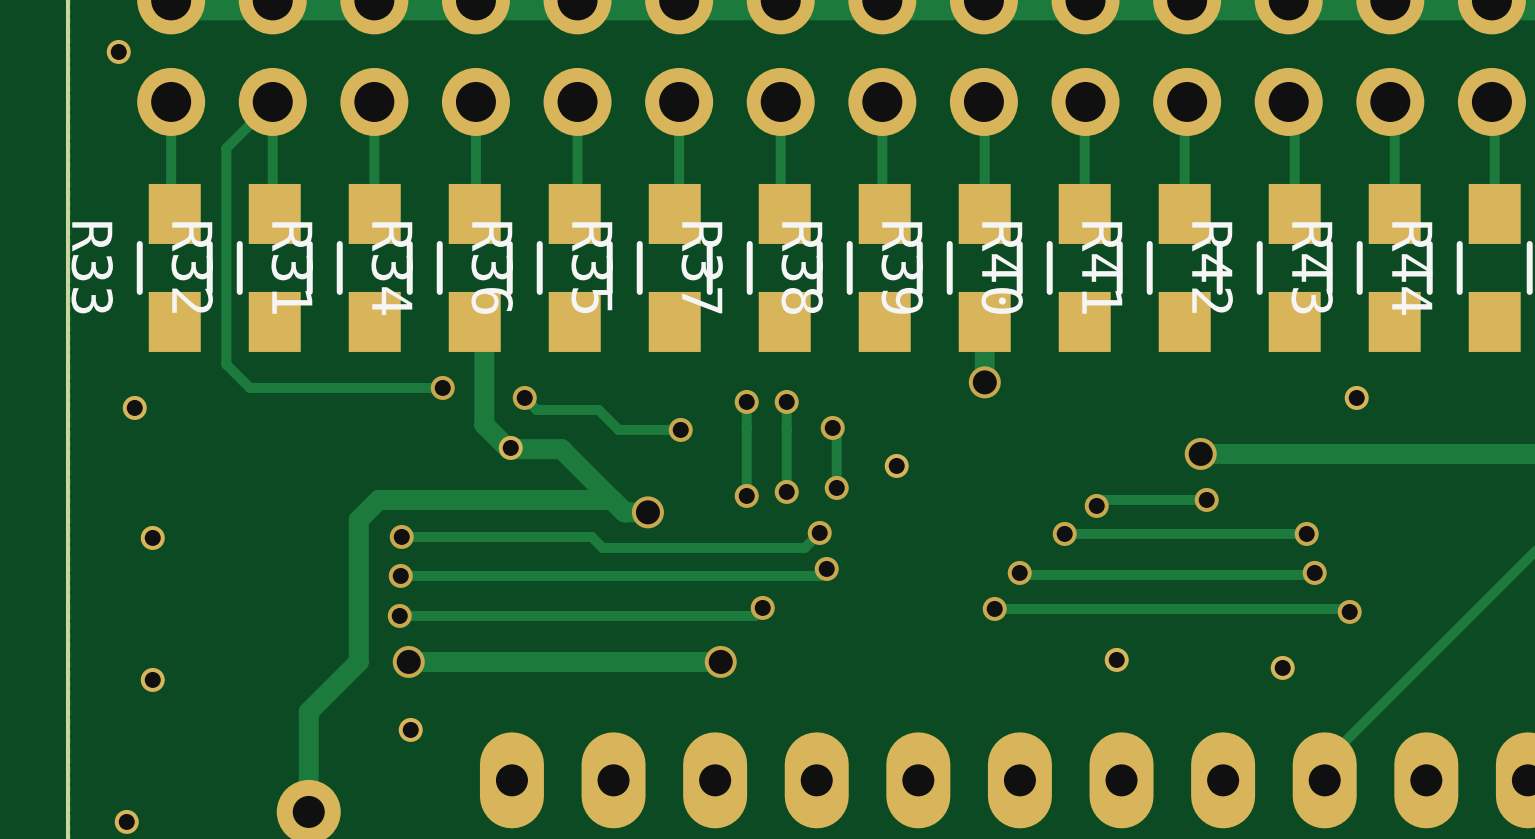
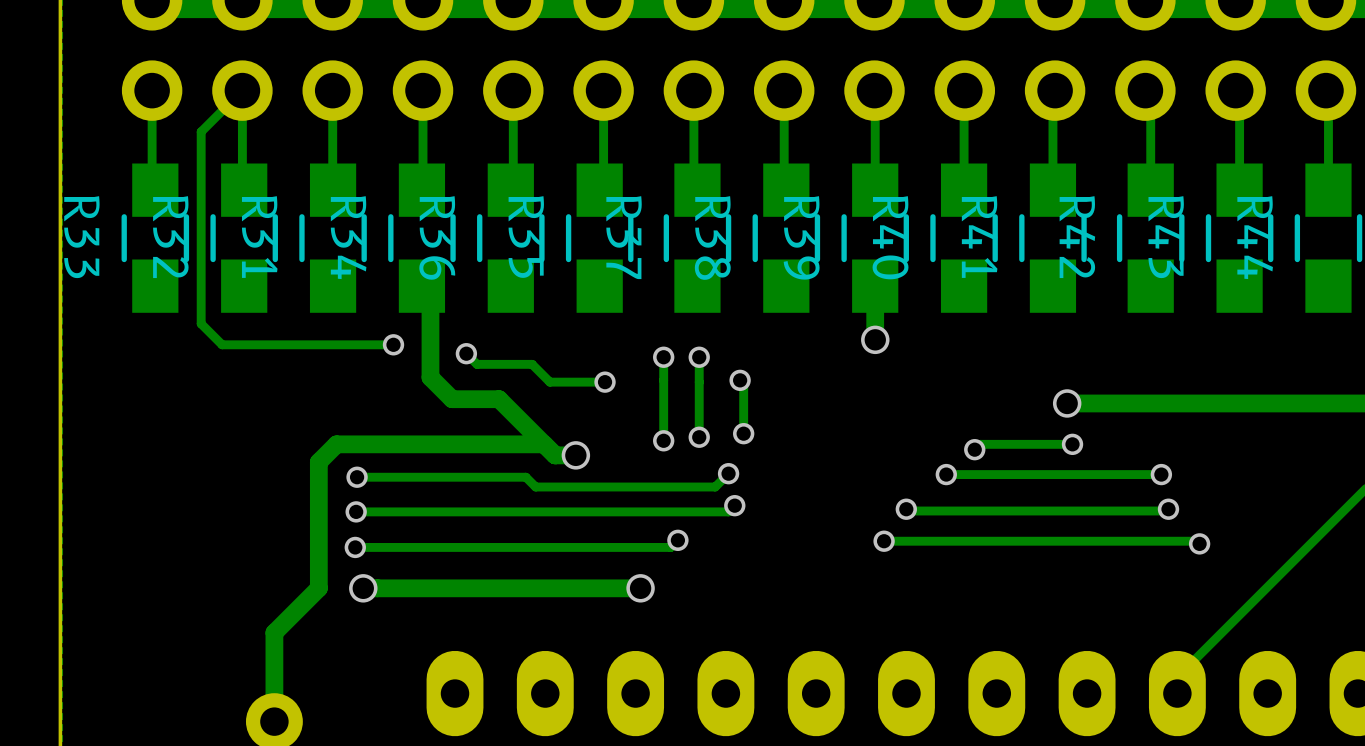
part: (118, 51) -> none
part: (1356, 397) -> none
part: (134, 407) -> none
part: (510, 447) -> none
part: (896, 465) -> none
part: (152, 537) -> none
part: (1116, 659) -> none
part: (1282, 667) -> none
part: (152, 679) -> none
part: (410, 729) -> none
part: (126, 821) -> none

